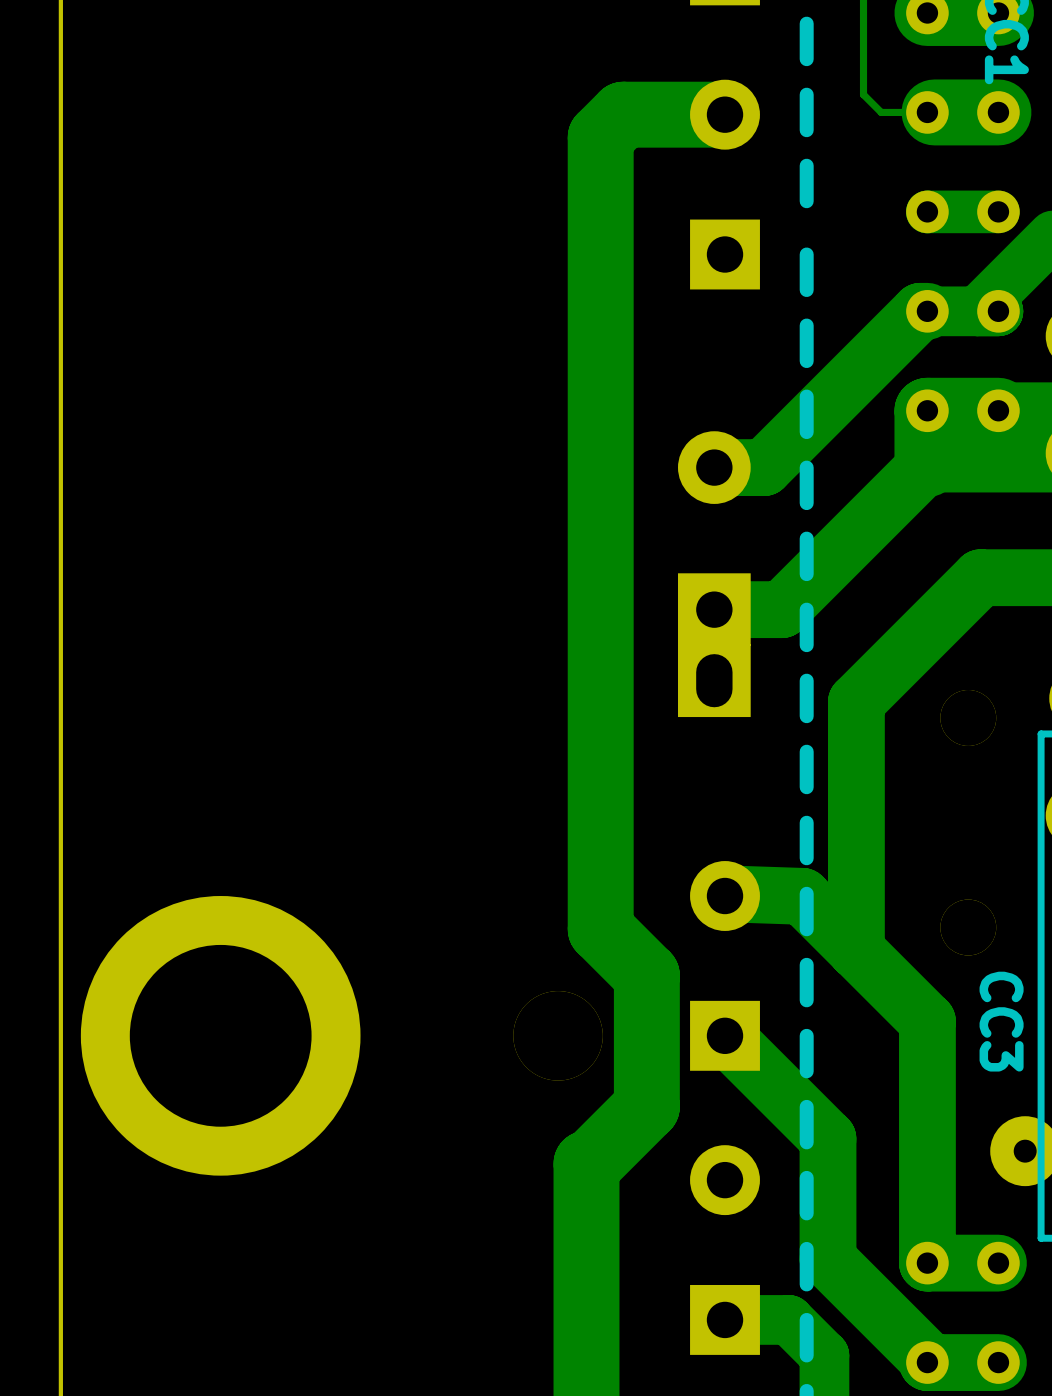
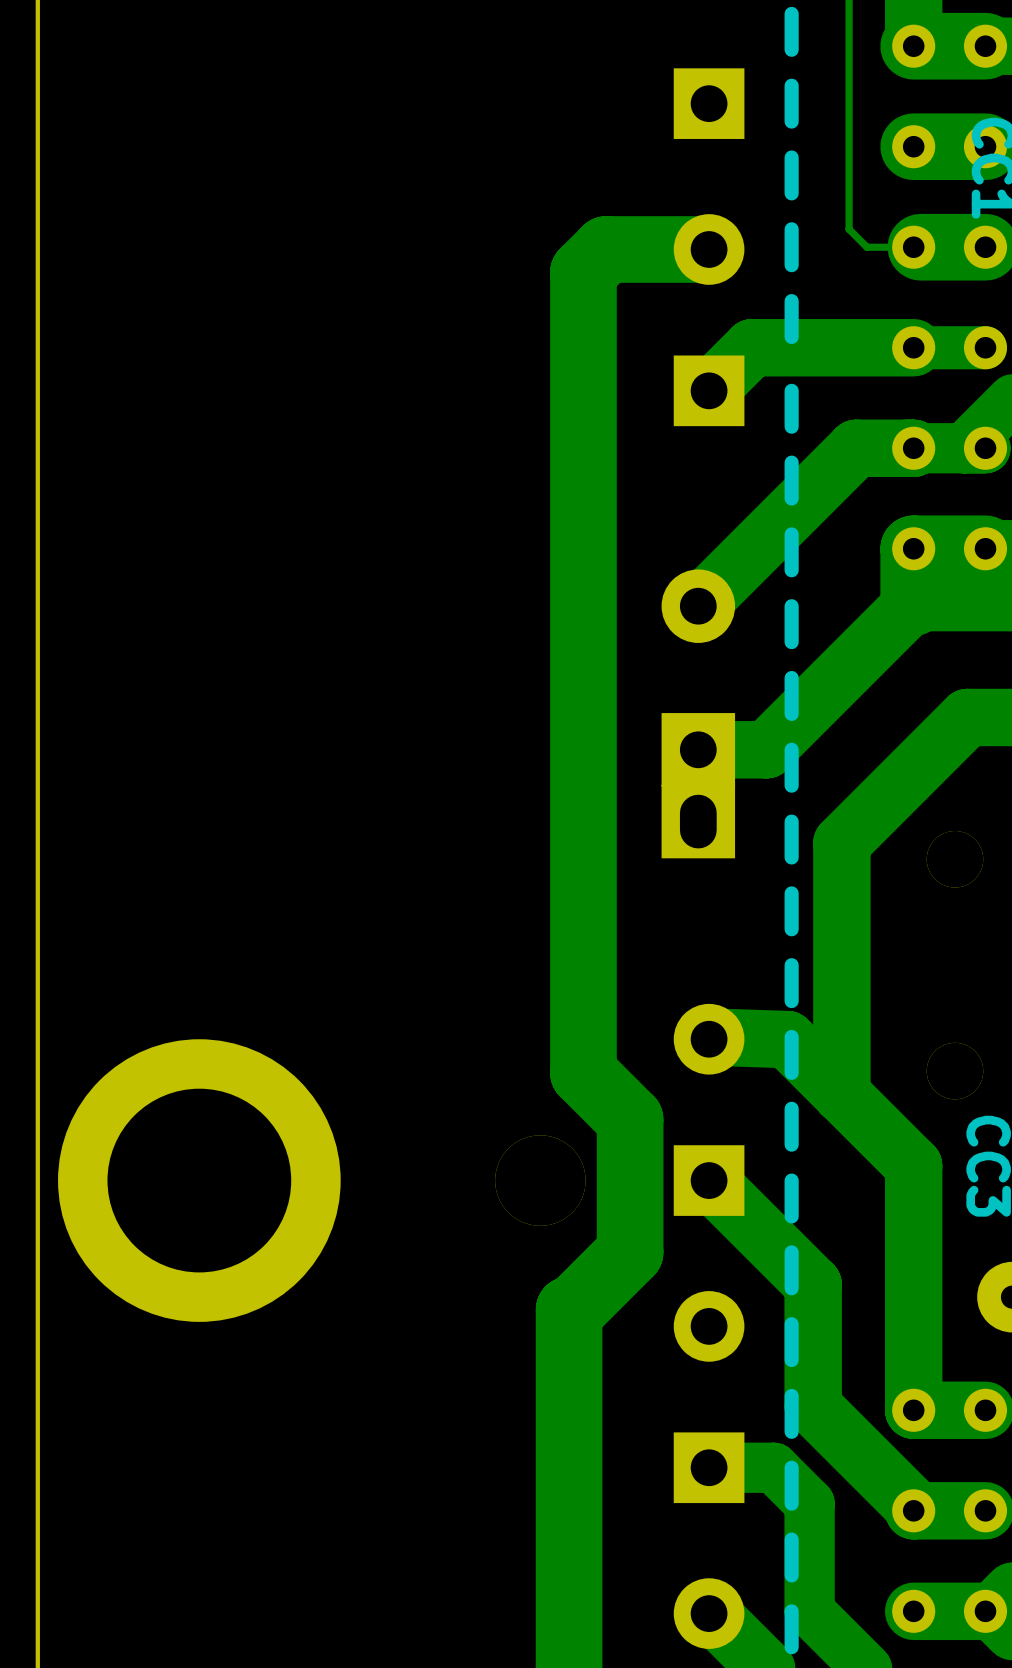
track: none -> (913, 347) (752, 347) (709, 390)
track: (920, 311) (764, 467) (714, 467) -> (906, 448) (856, 448) (698, 606)

